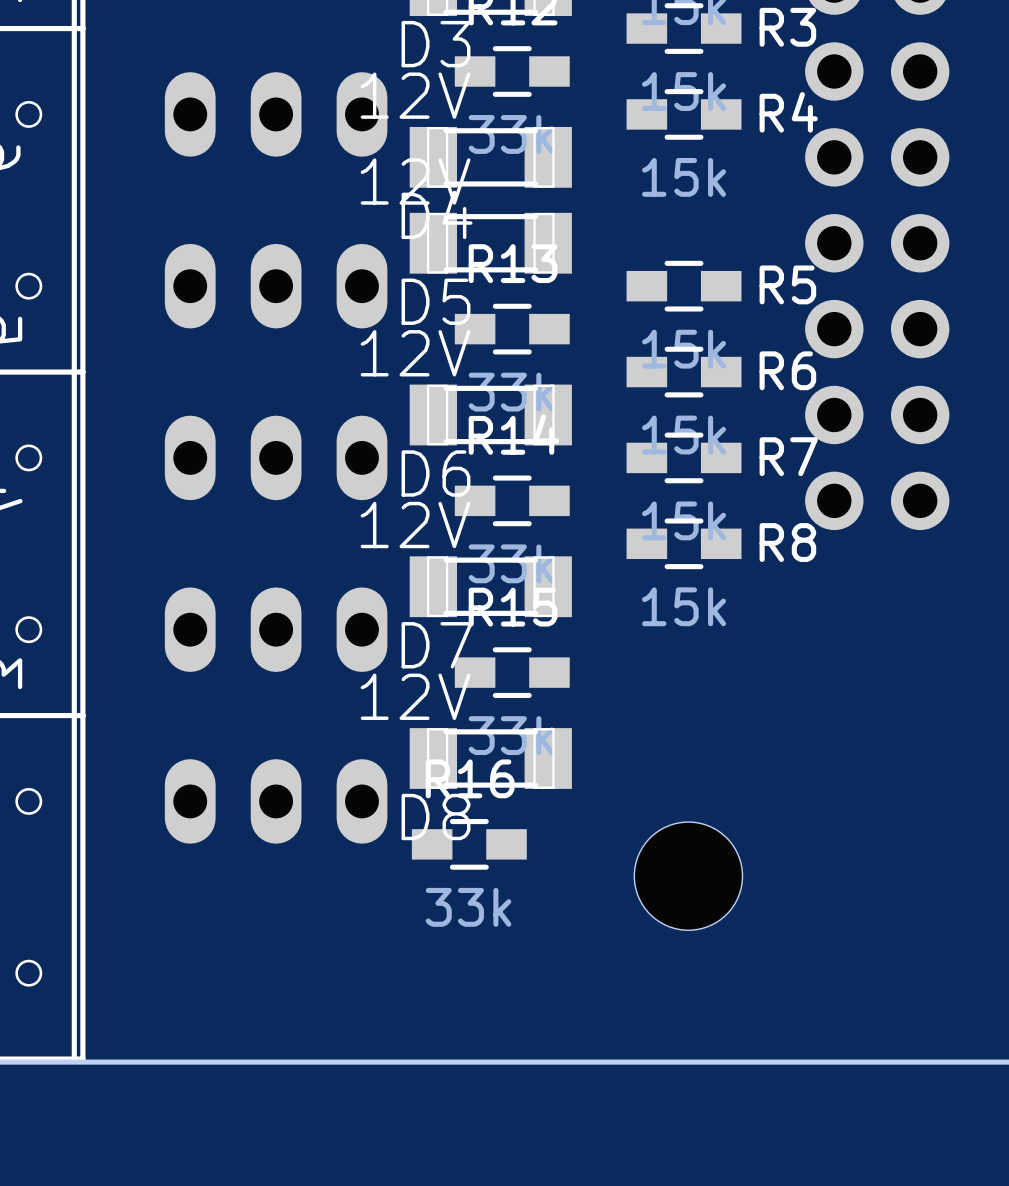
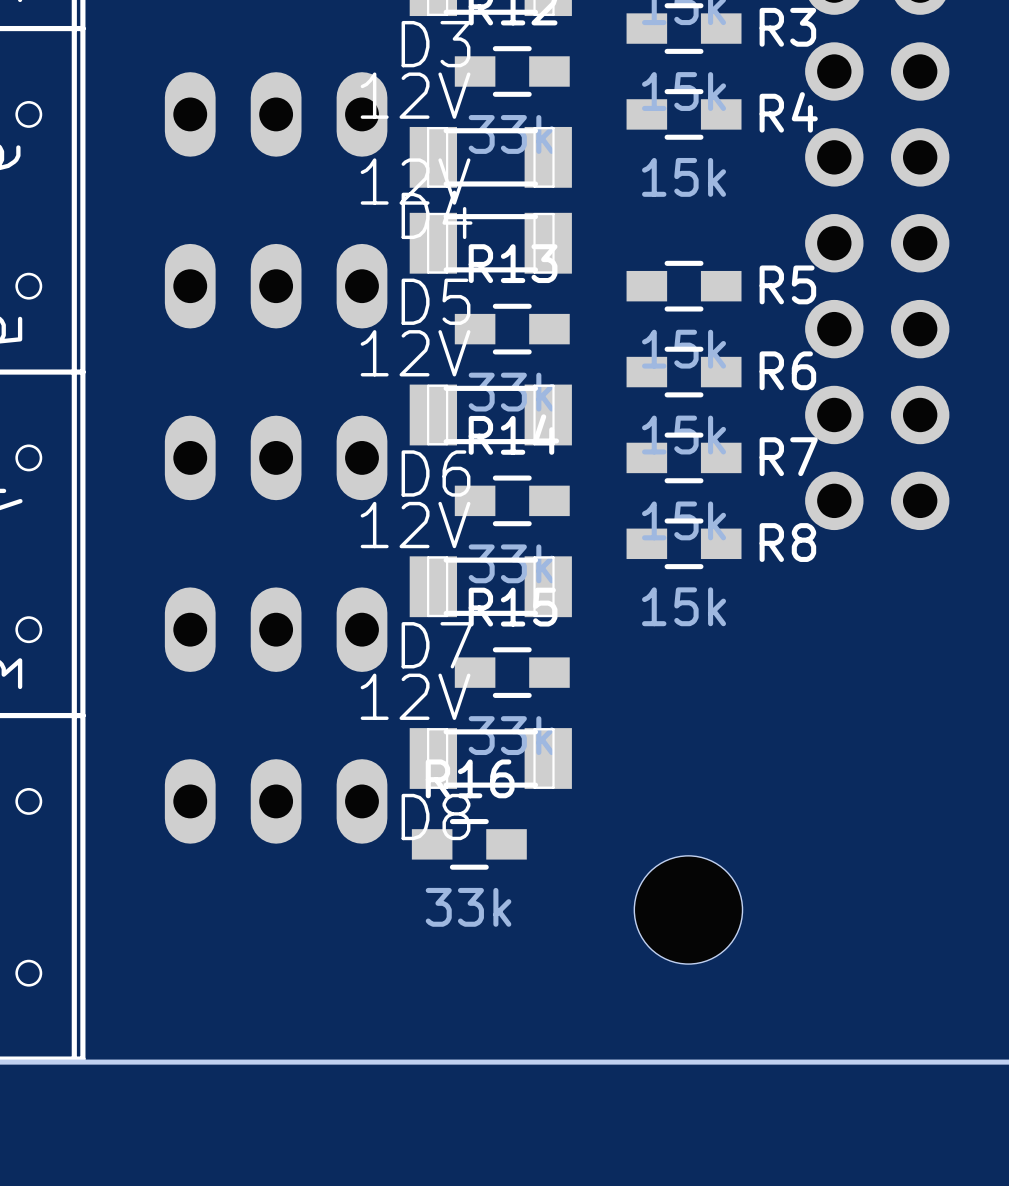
part position: (688, 876) -> (688, 909)

